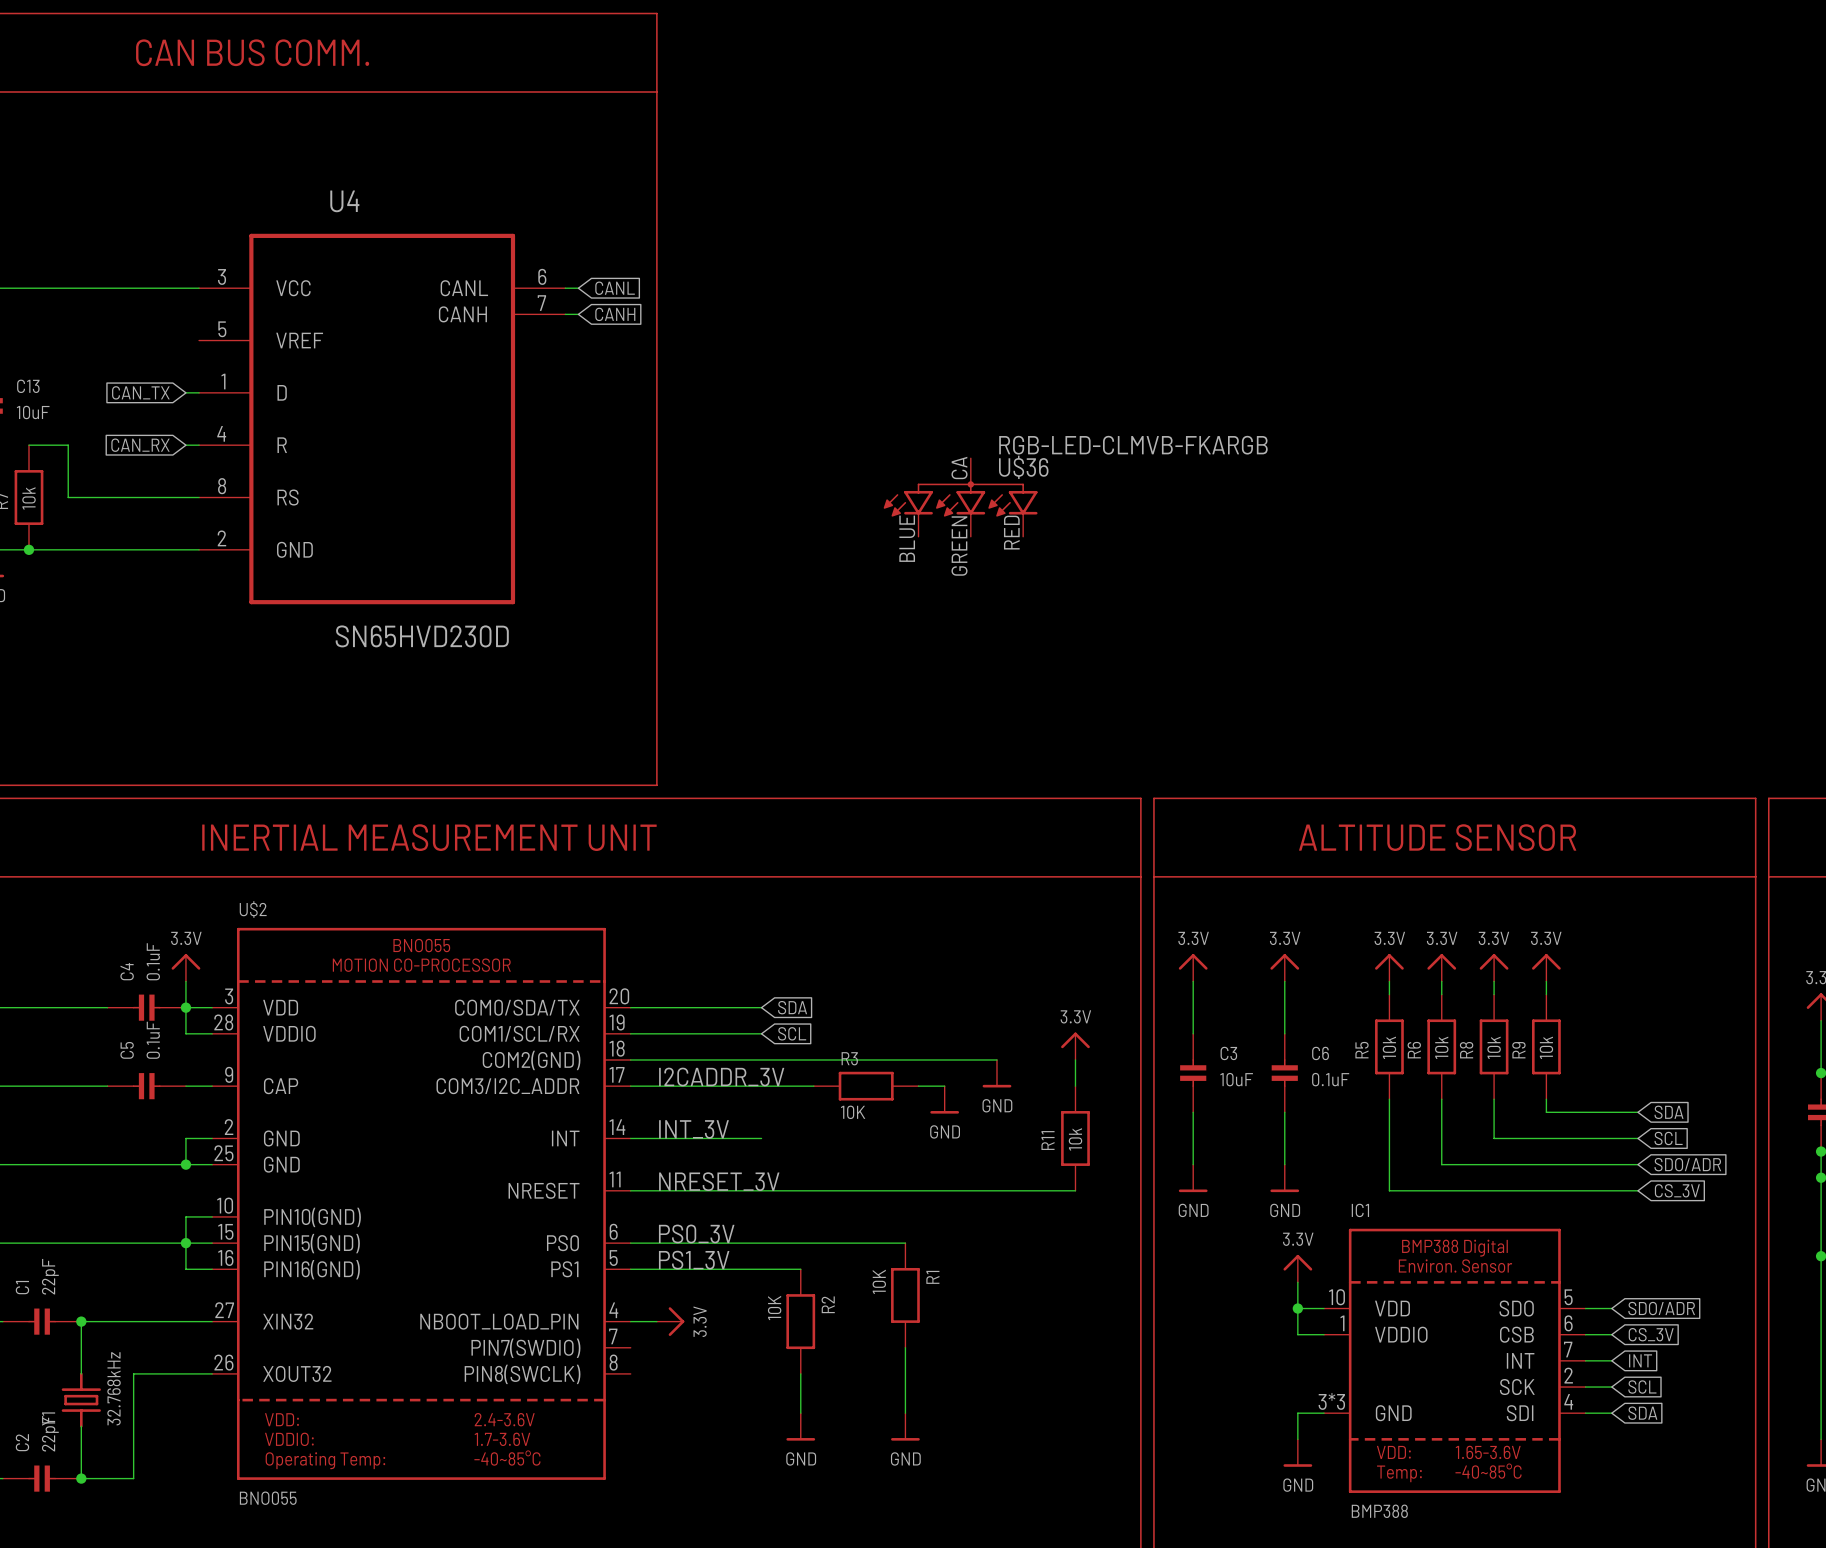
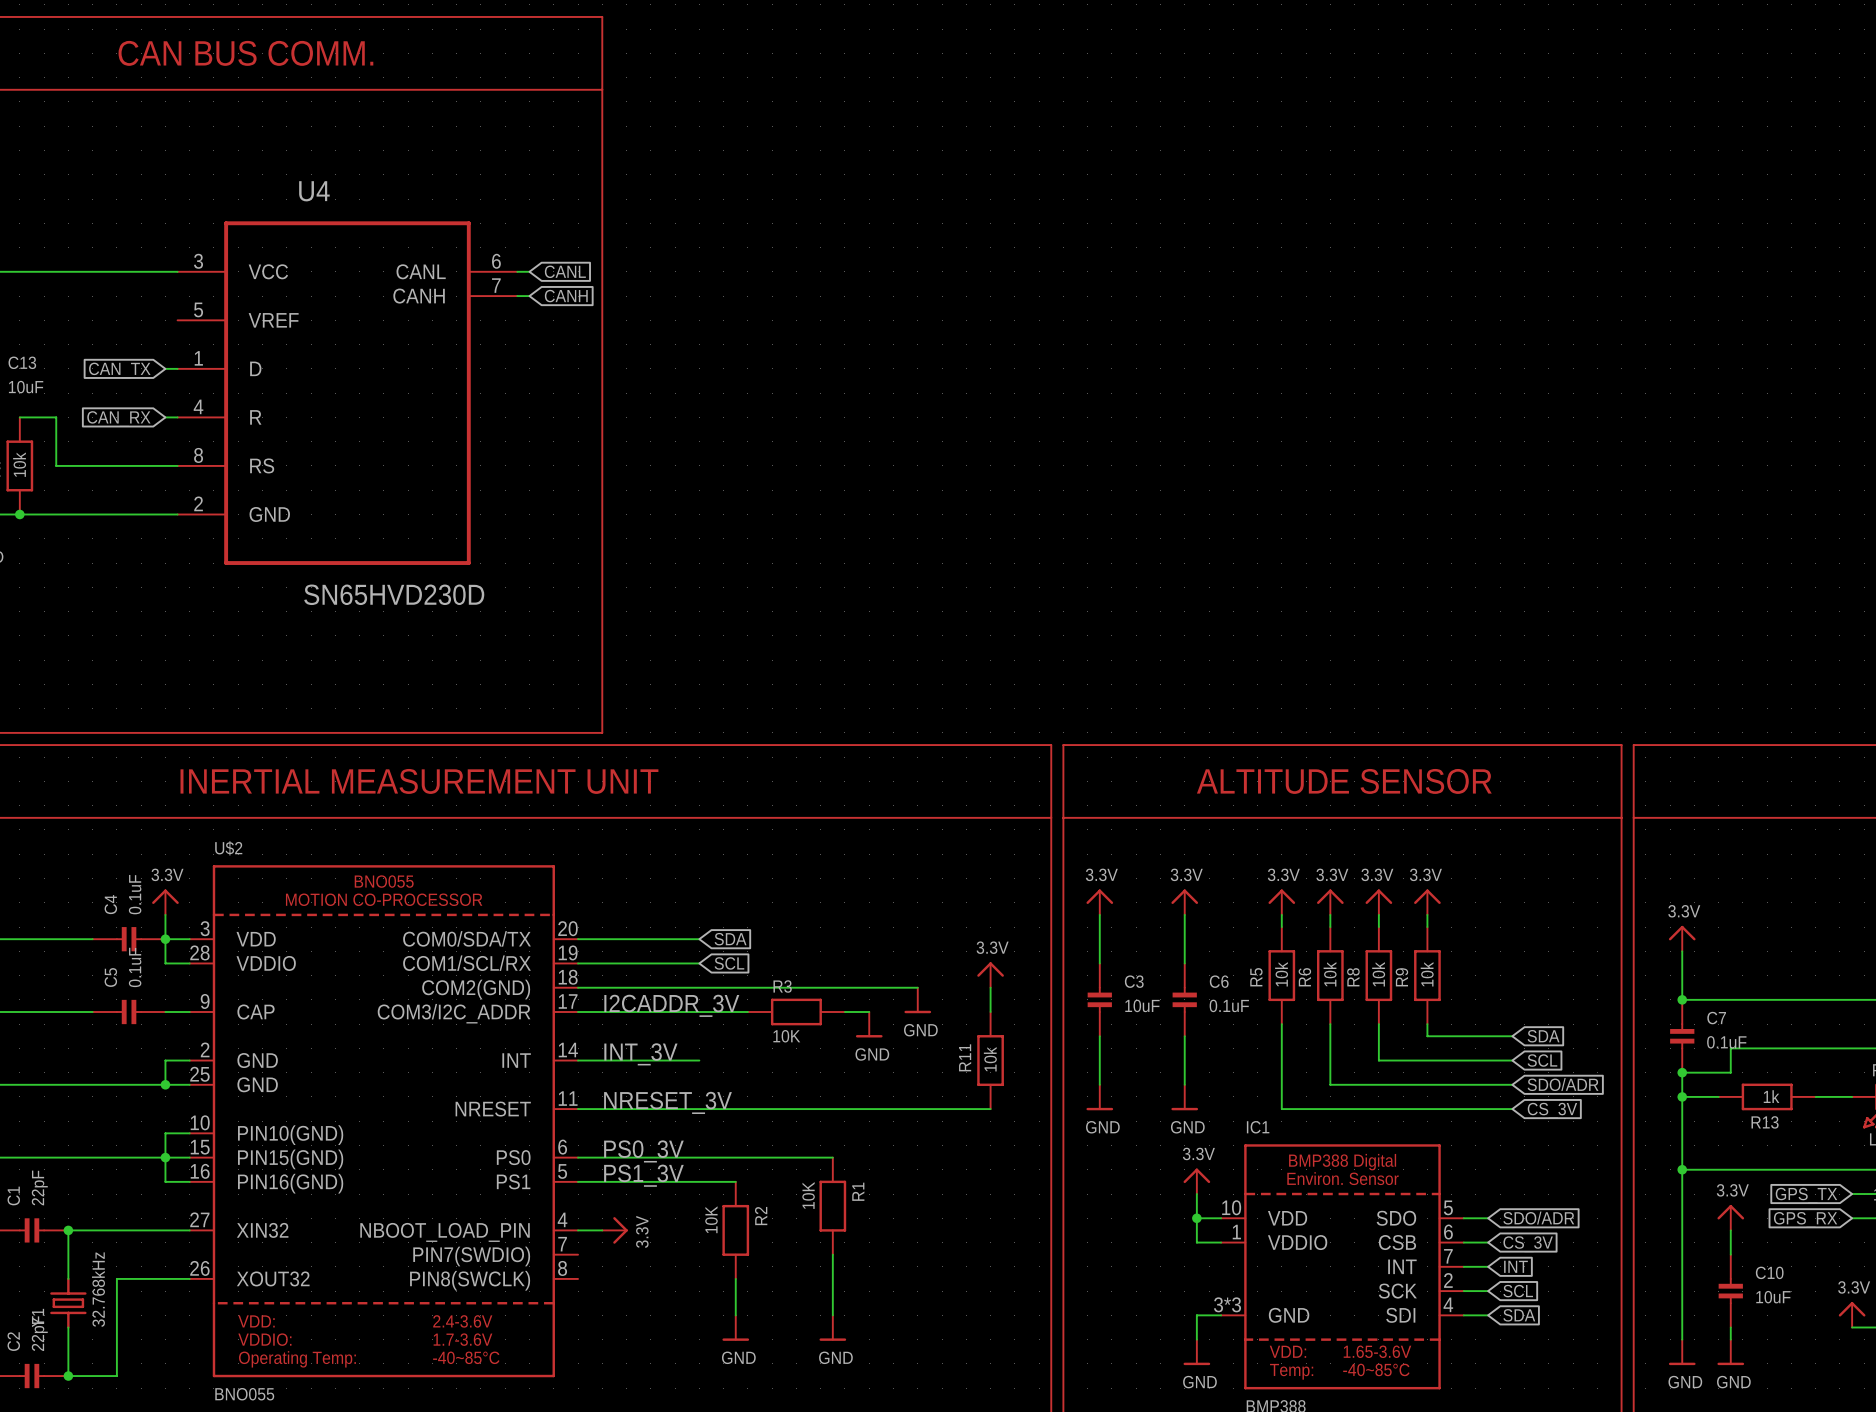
U$36: RGB-LED-CLMVB-FKARGB (960, 497) -> none

